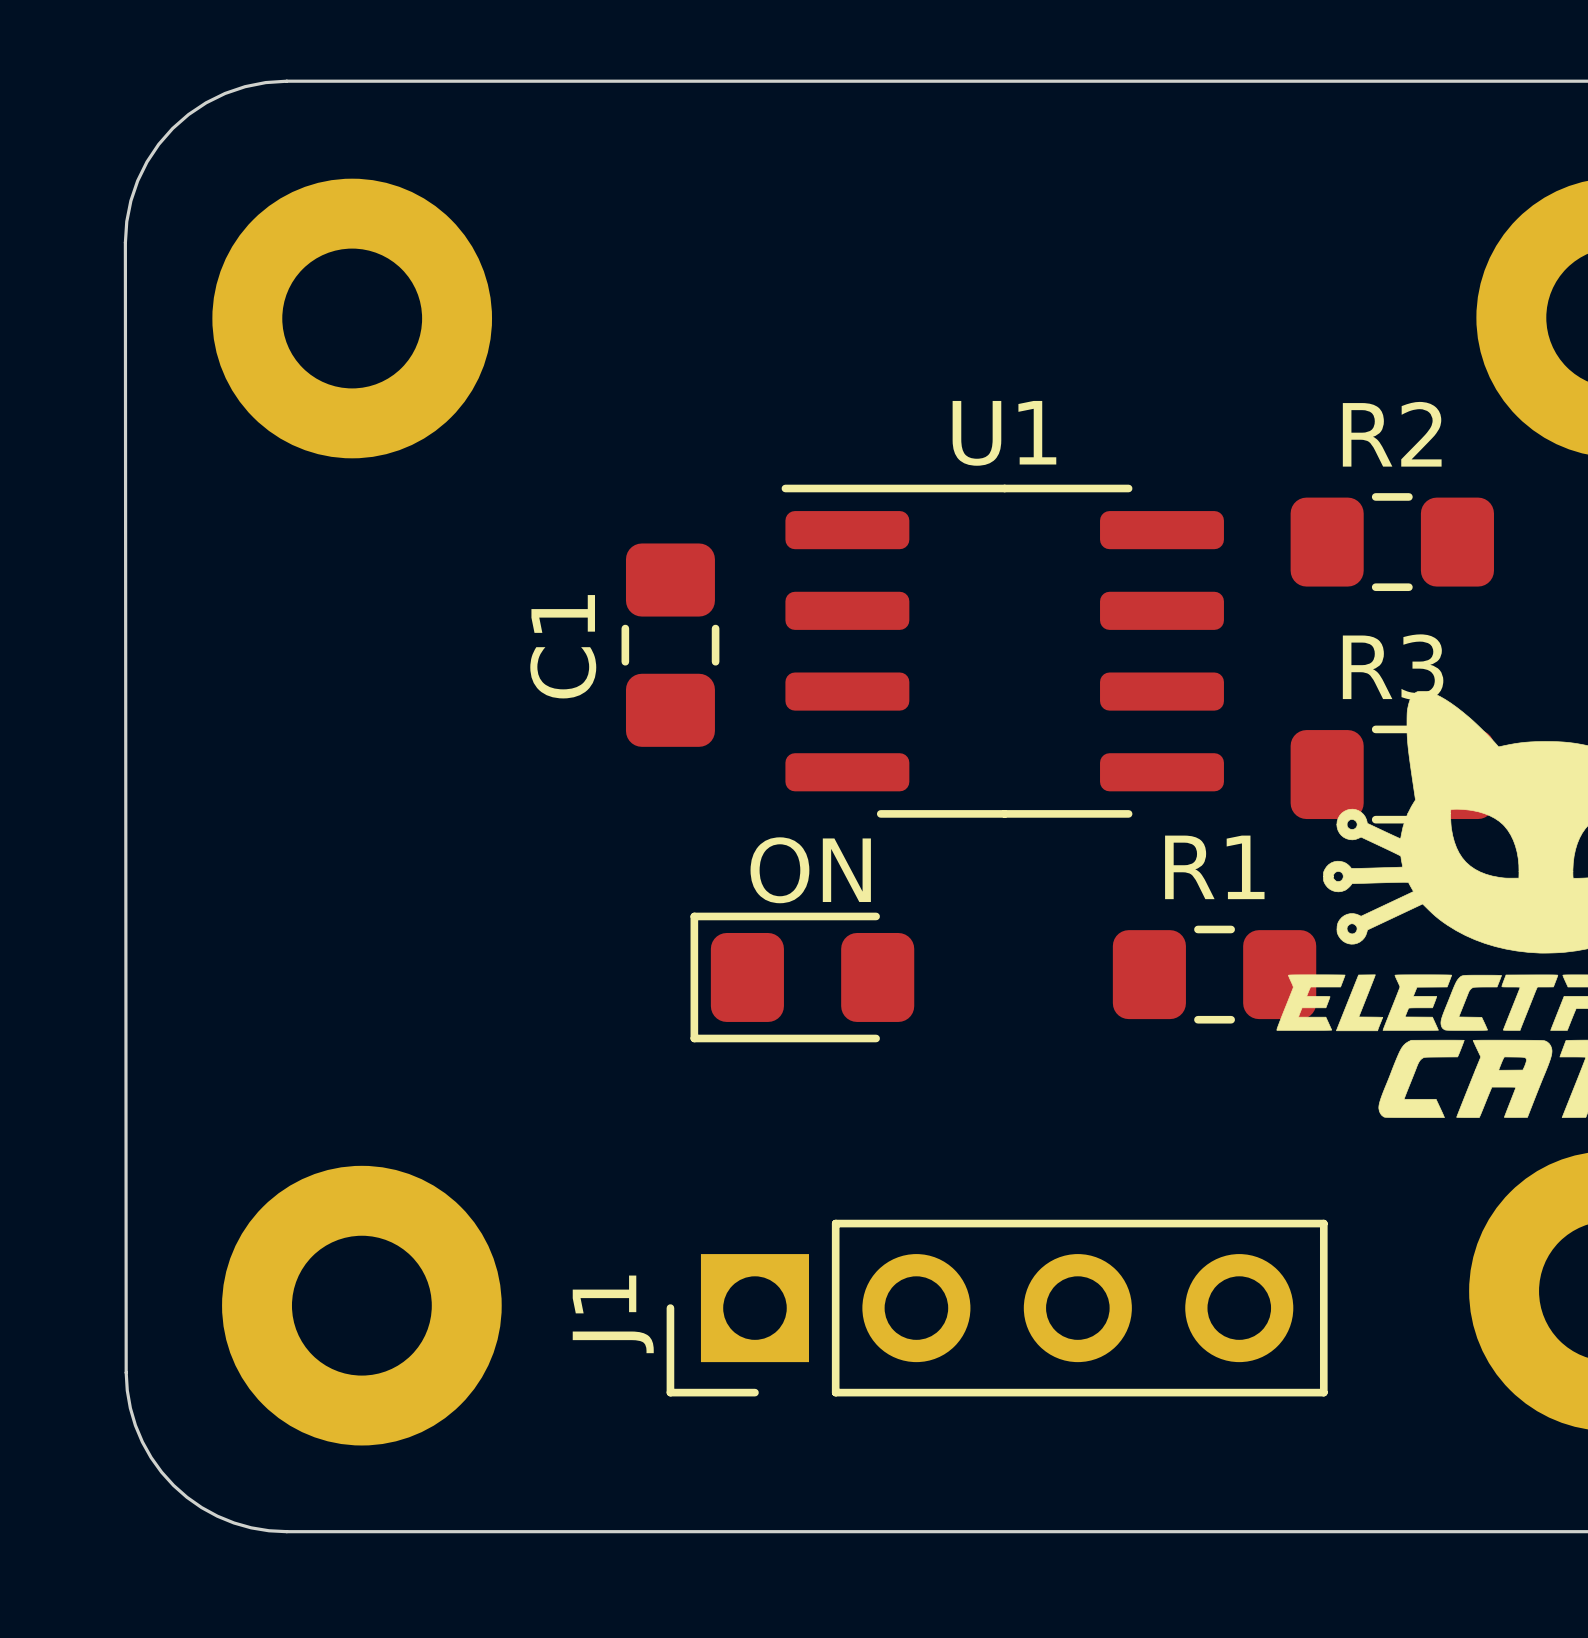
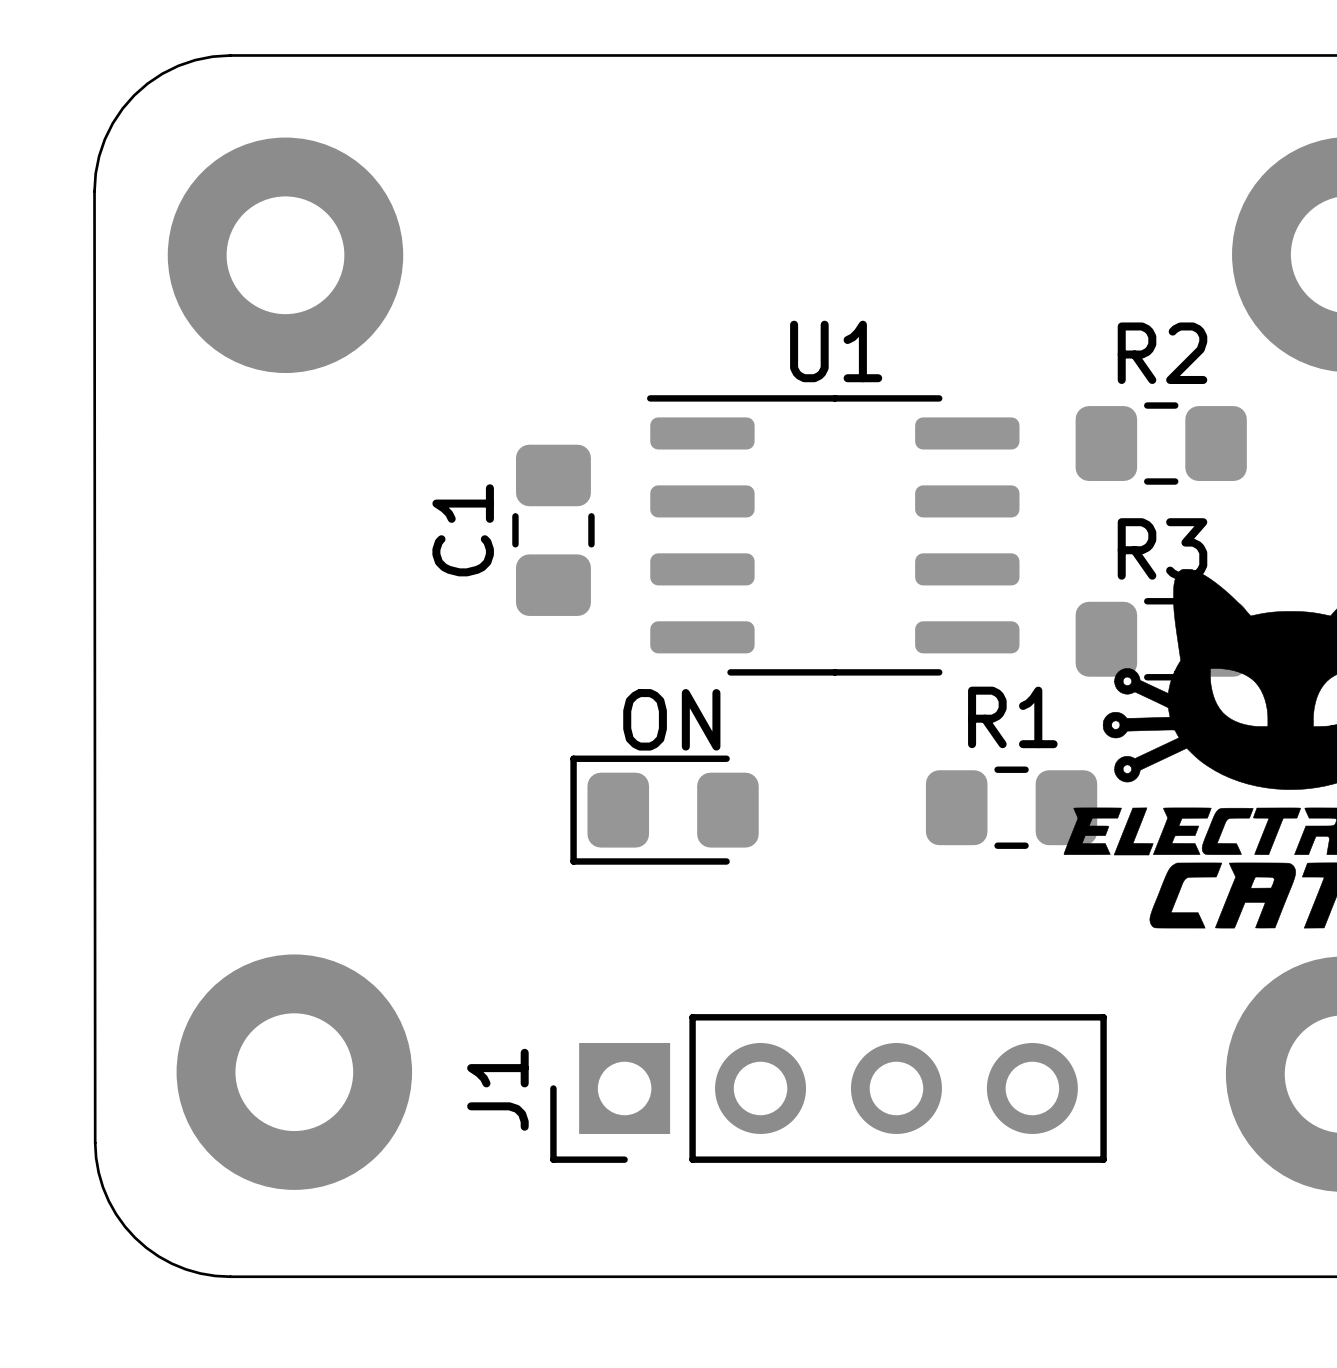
part position: (361, 1305) -> (294, 1072)

